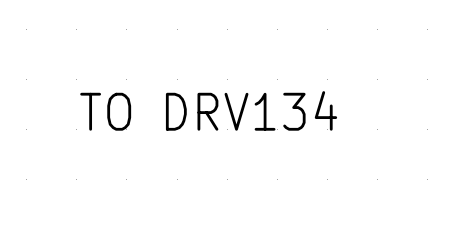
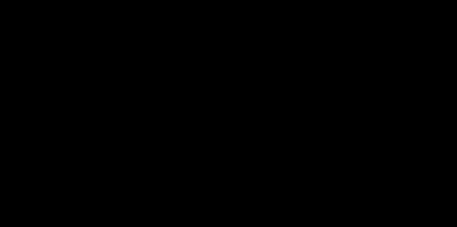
text: TO DRV134 (208, 110) -> none

